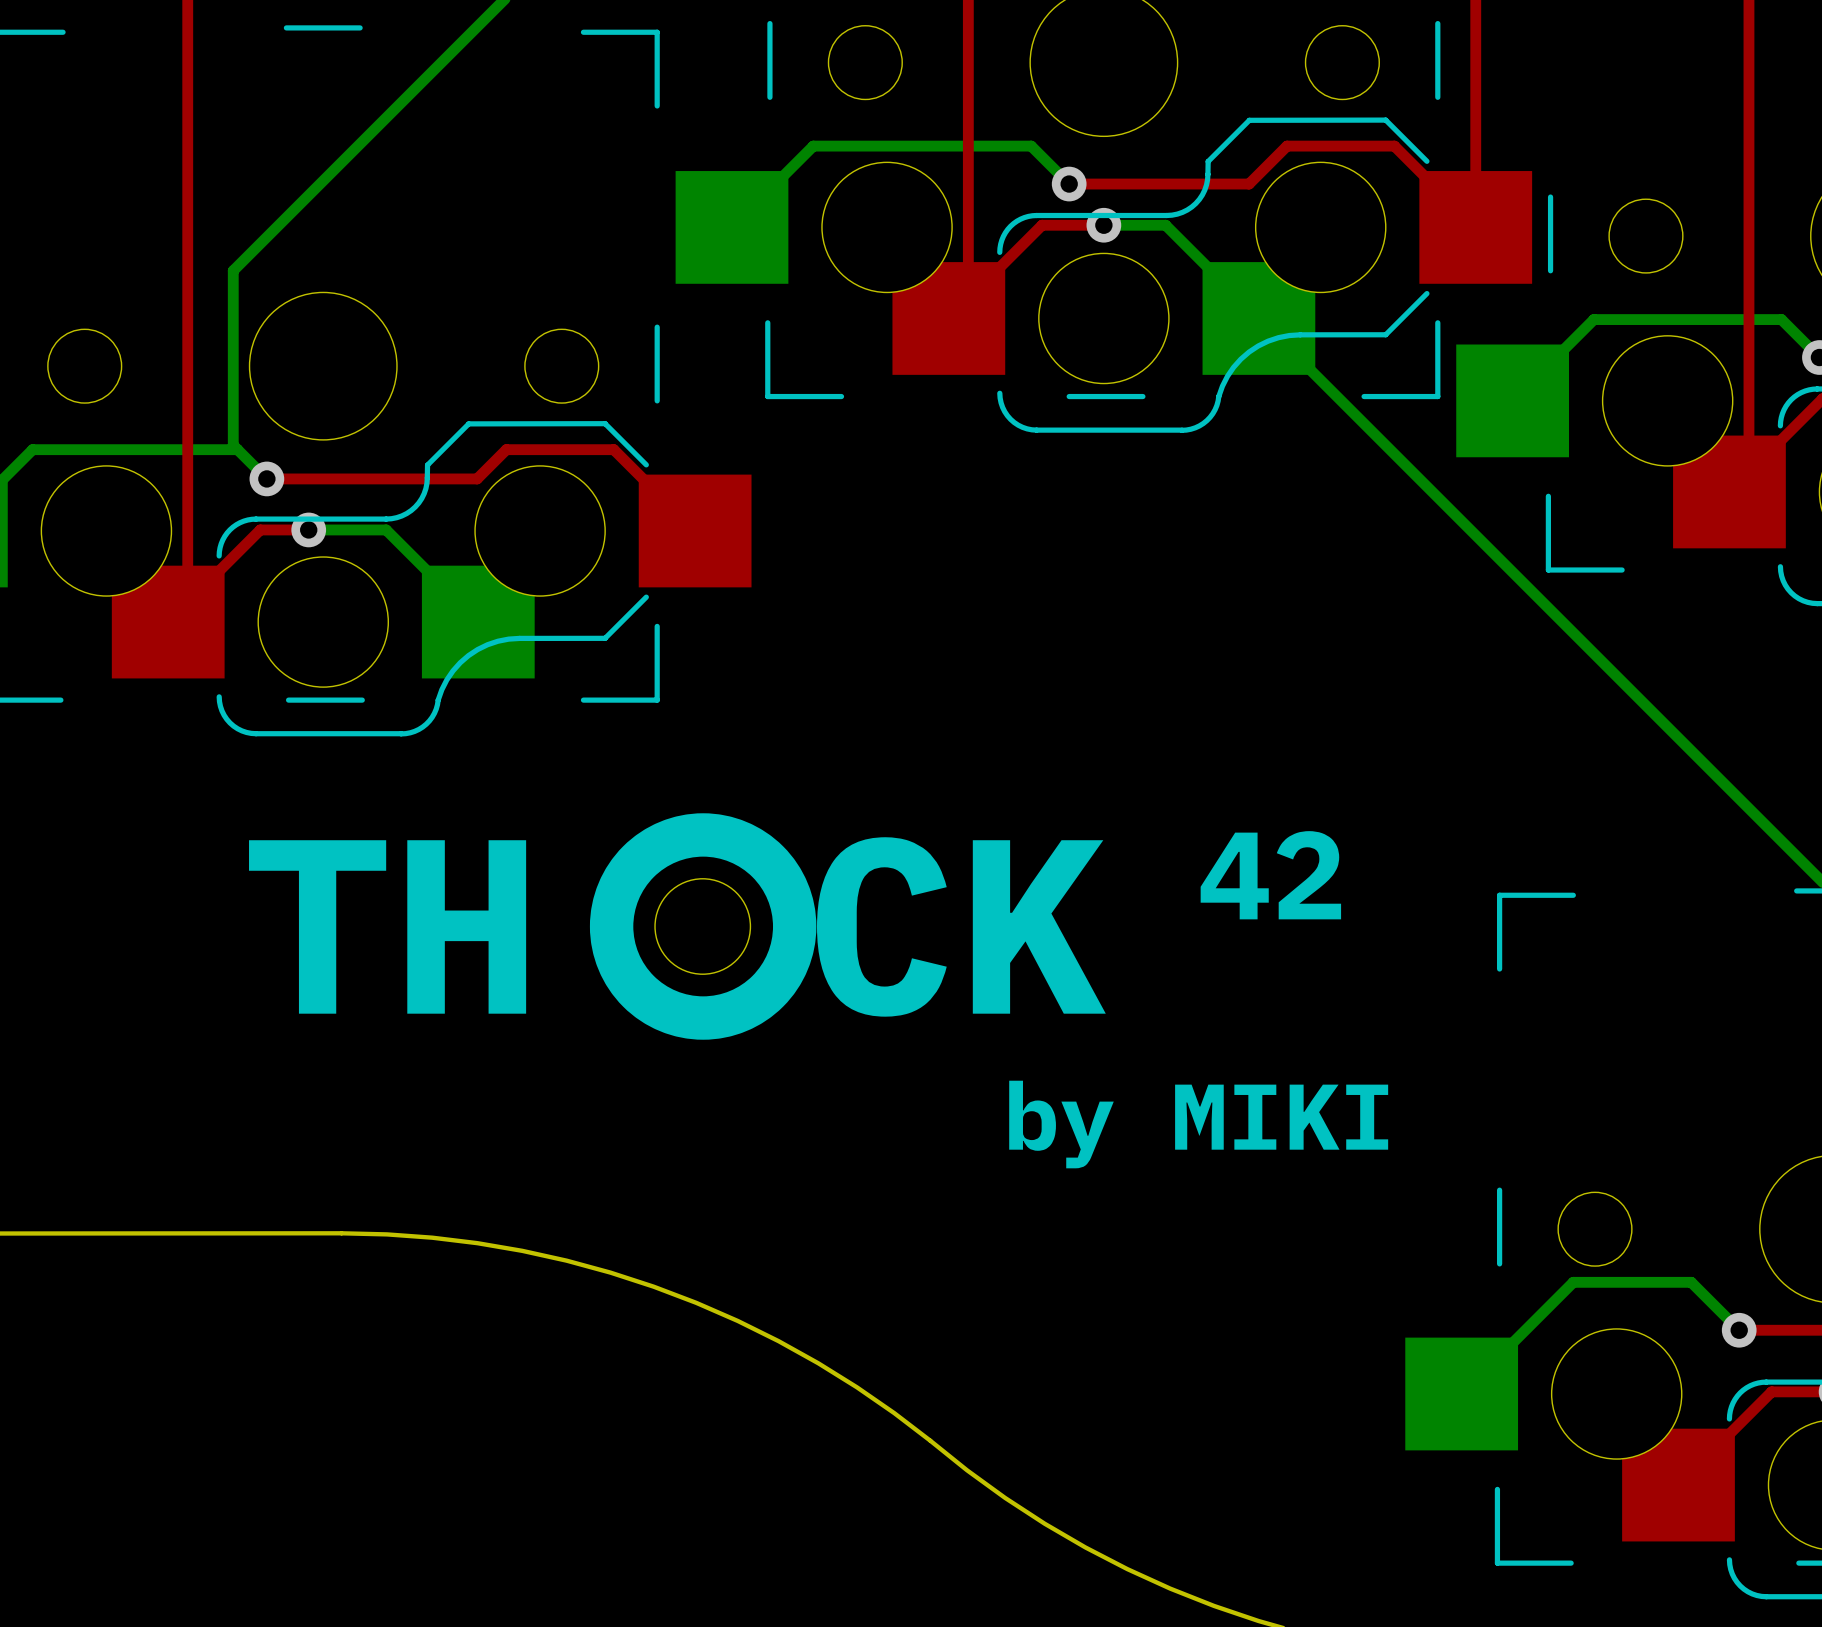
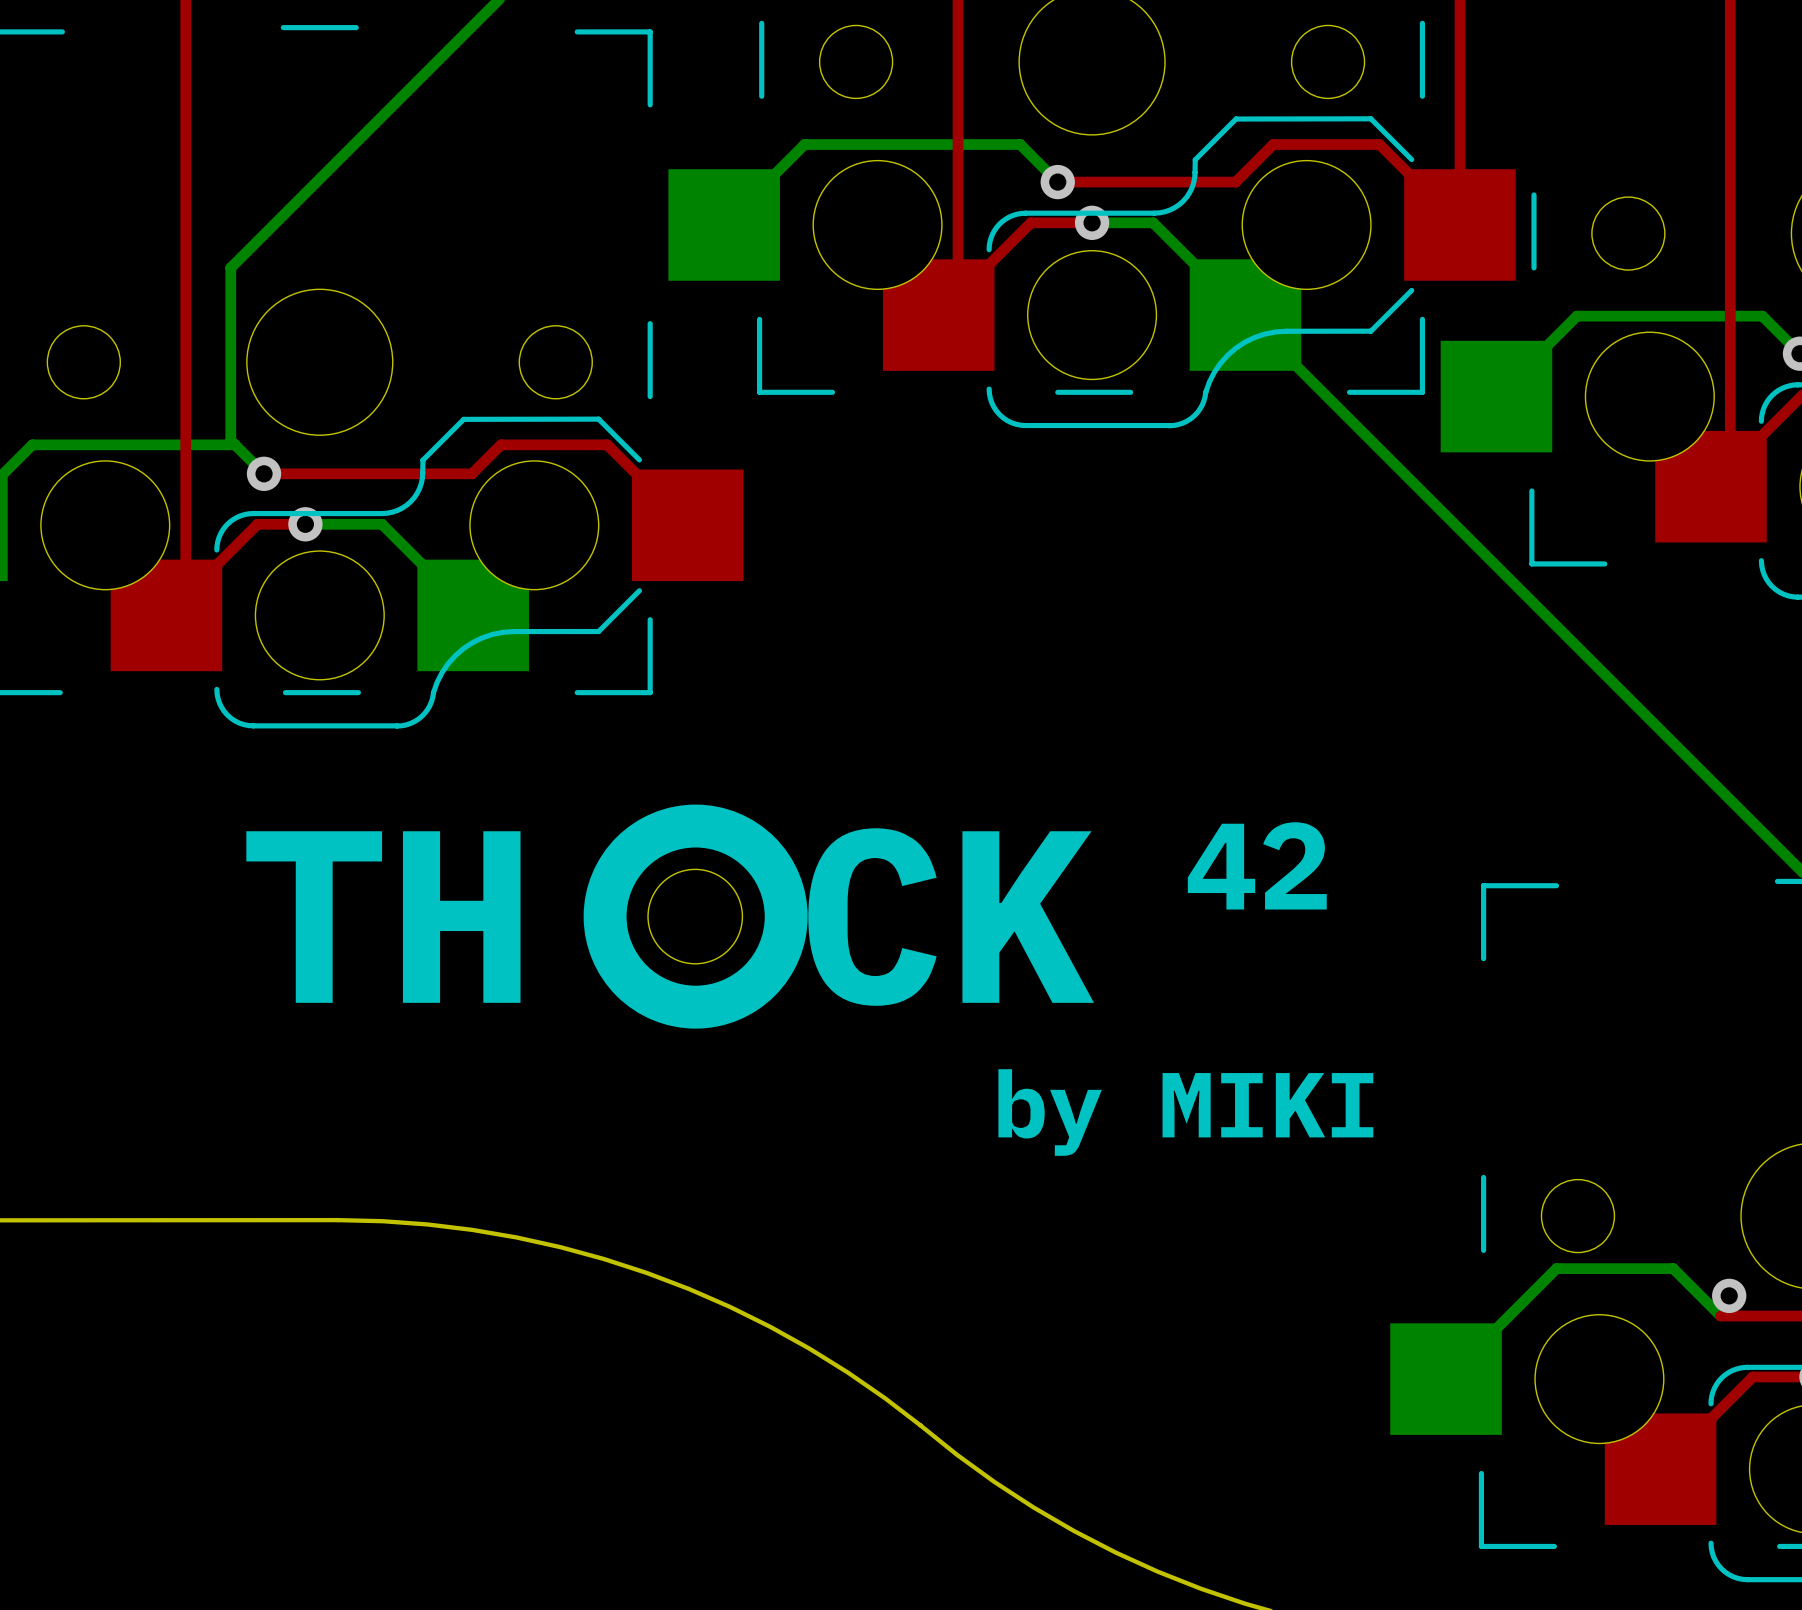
via position: (1739, 1330) -> (1729, 1295)

